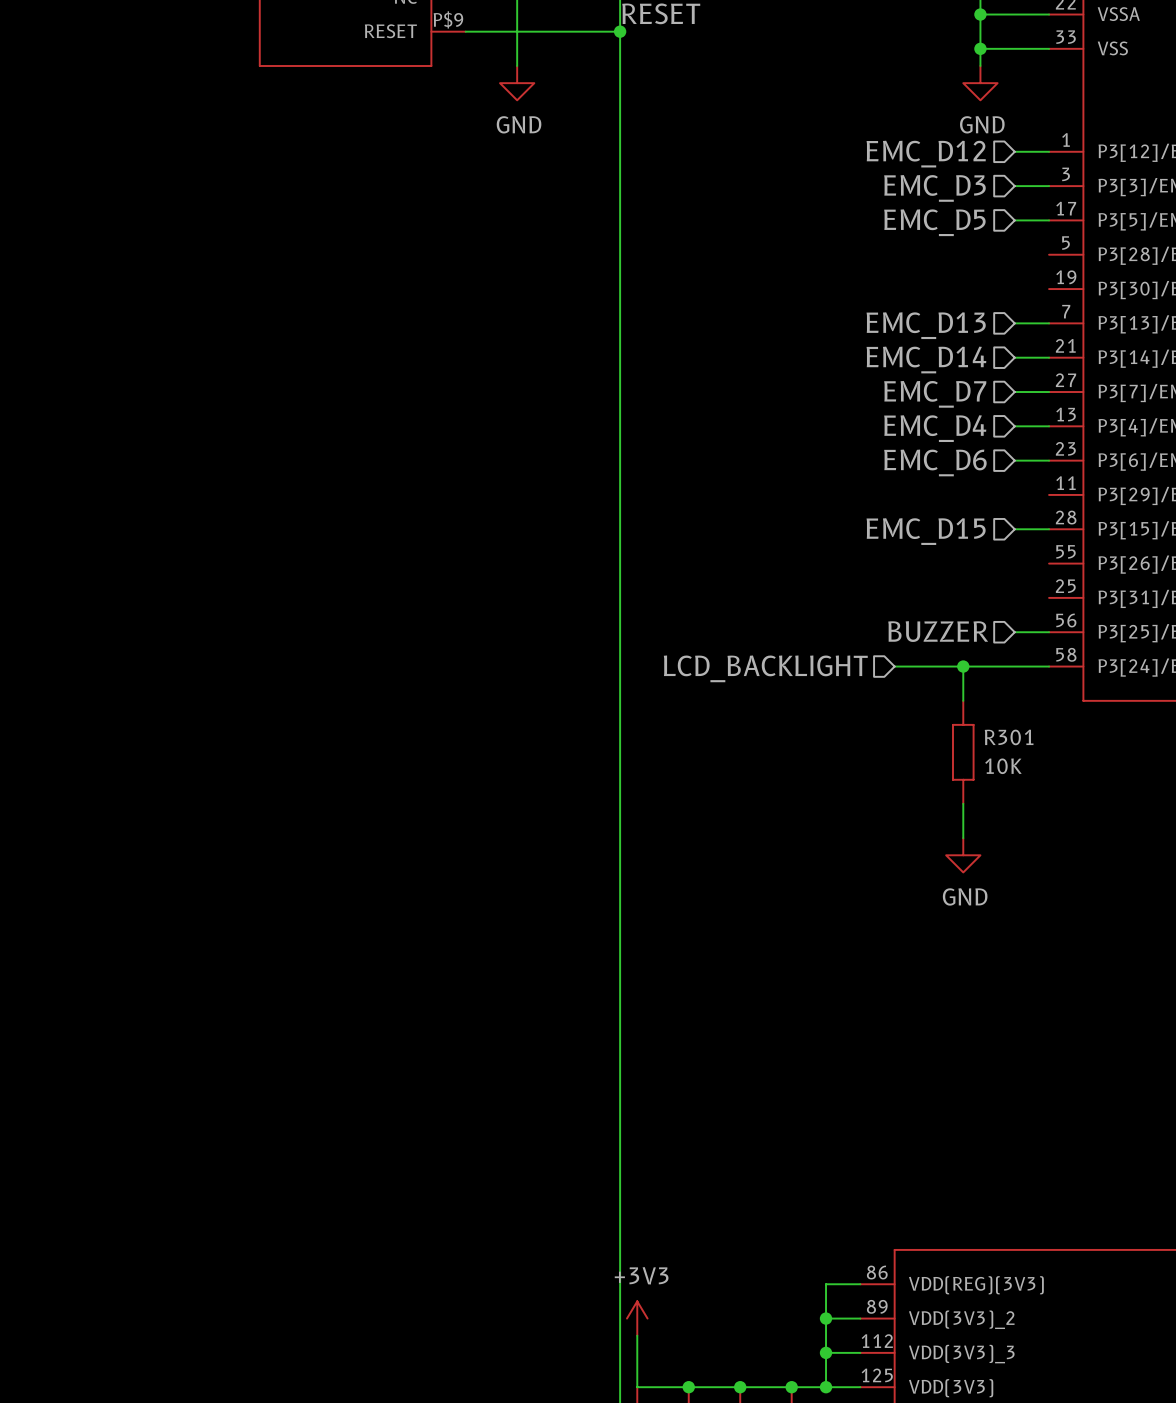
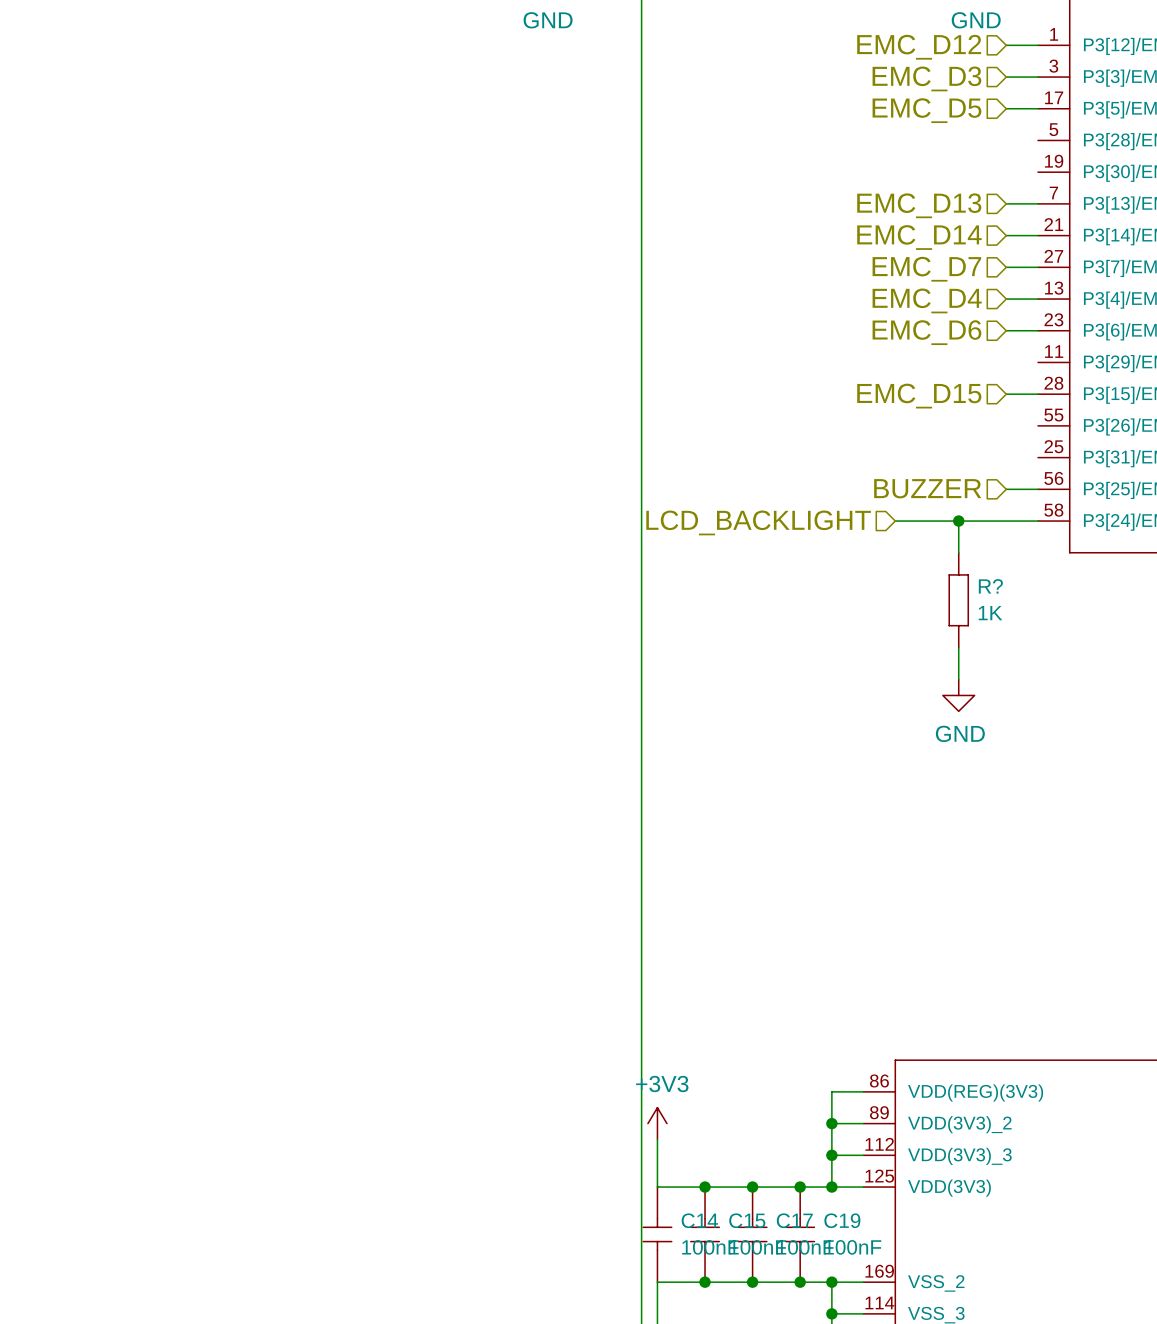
R301 name: R301 (1009, 737) -> R? (990, 586)
R301 value: 10K (1003, 766) -> 1K (990, 613)

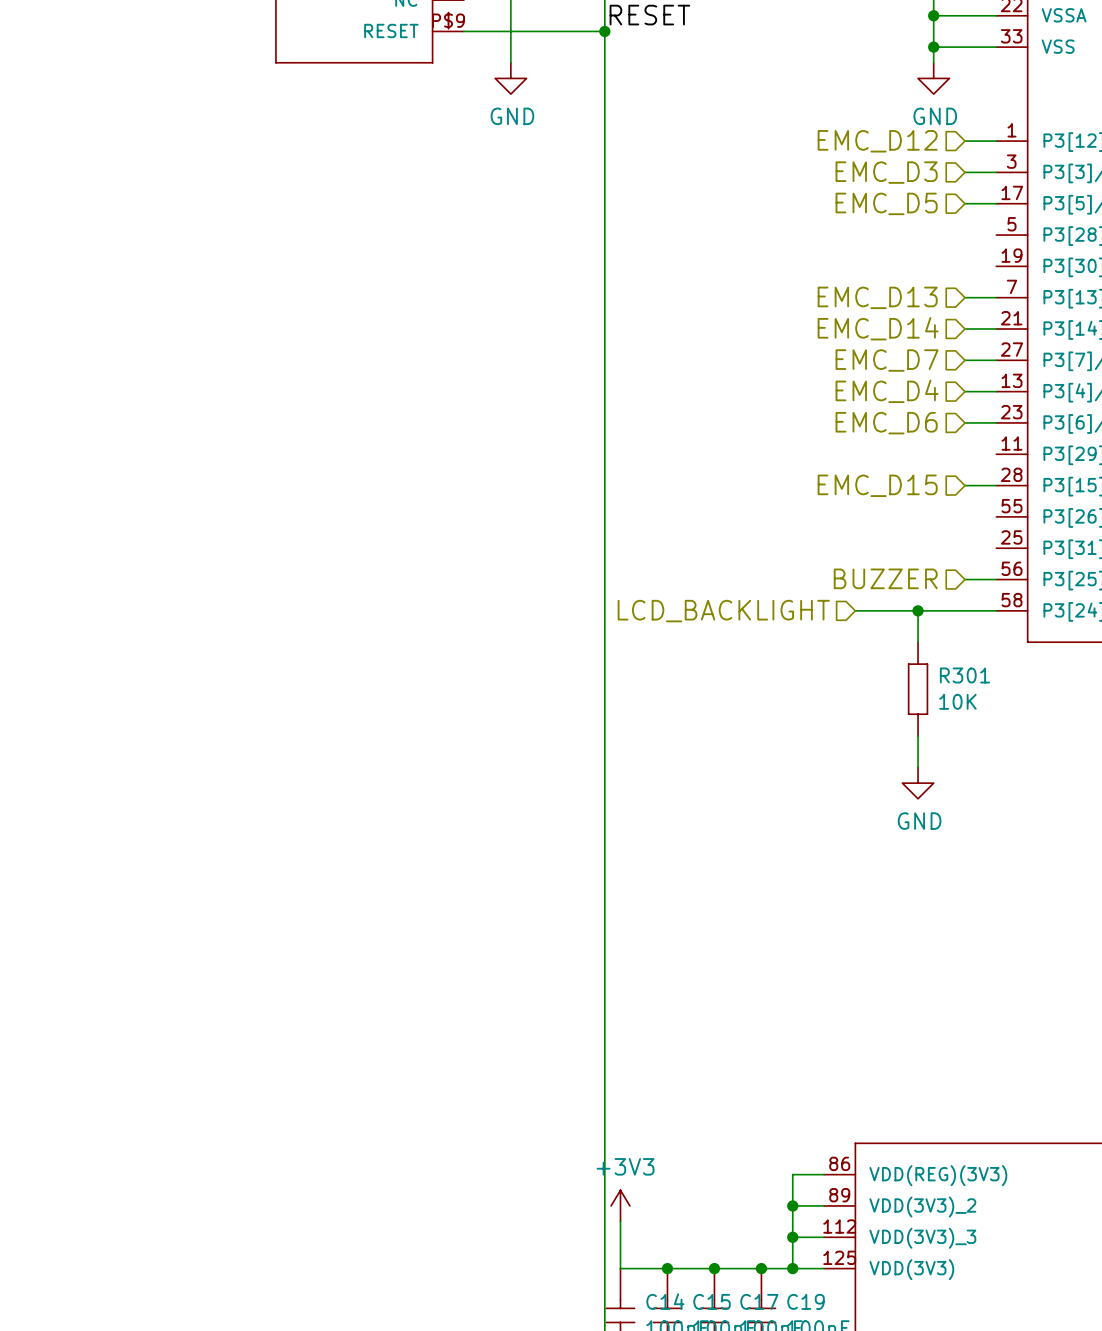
R? name: R? (990, 586) -> R301 (964, 675)
R? value: 1K (990, 613) -> 10K (957, 701)

